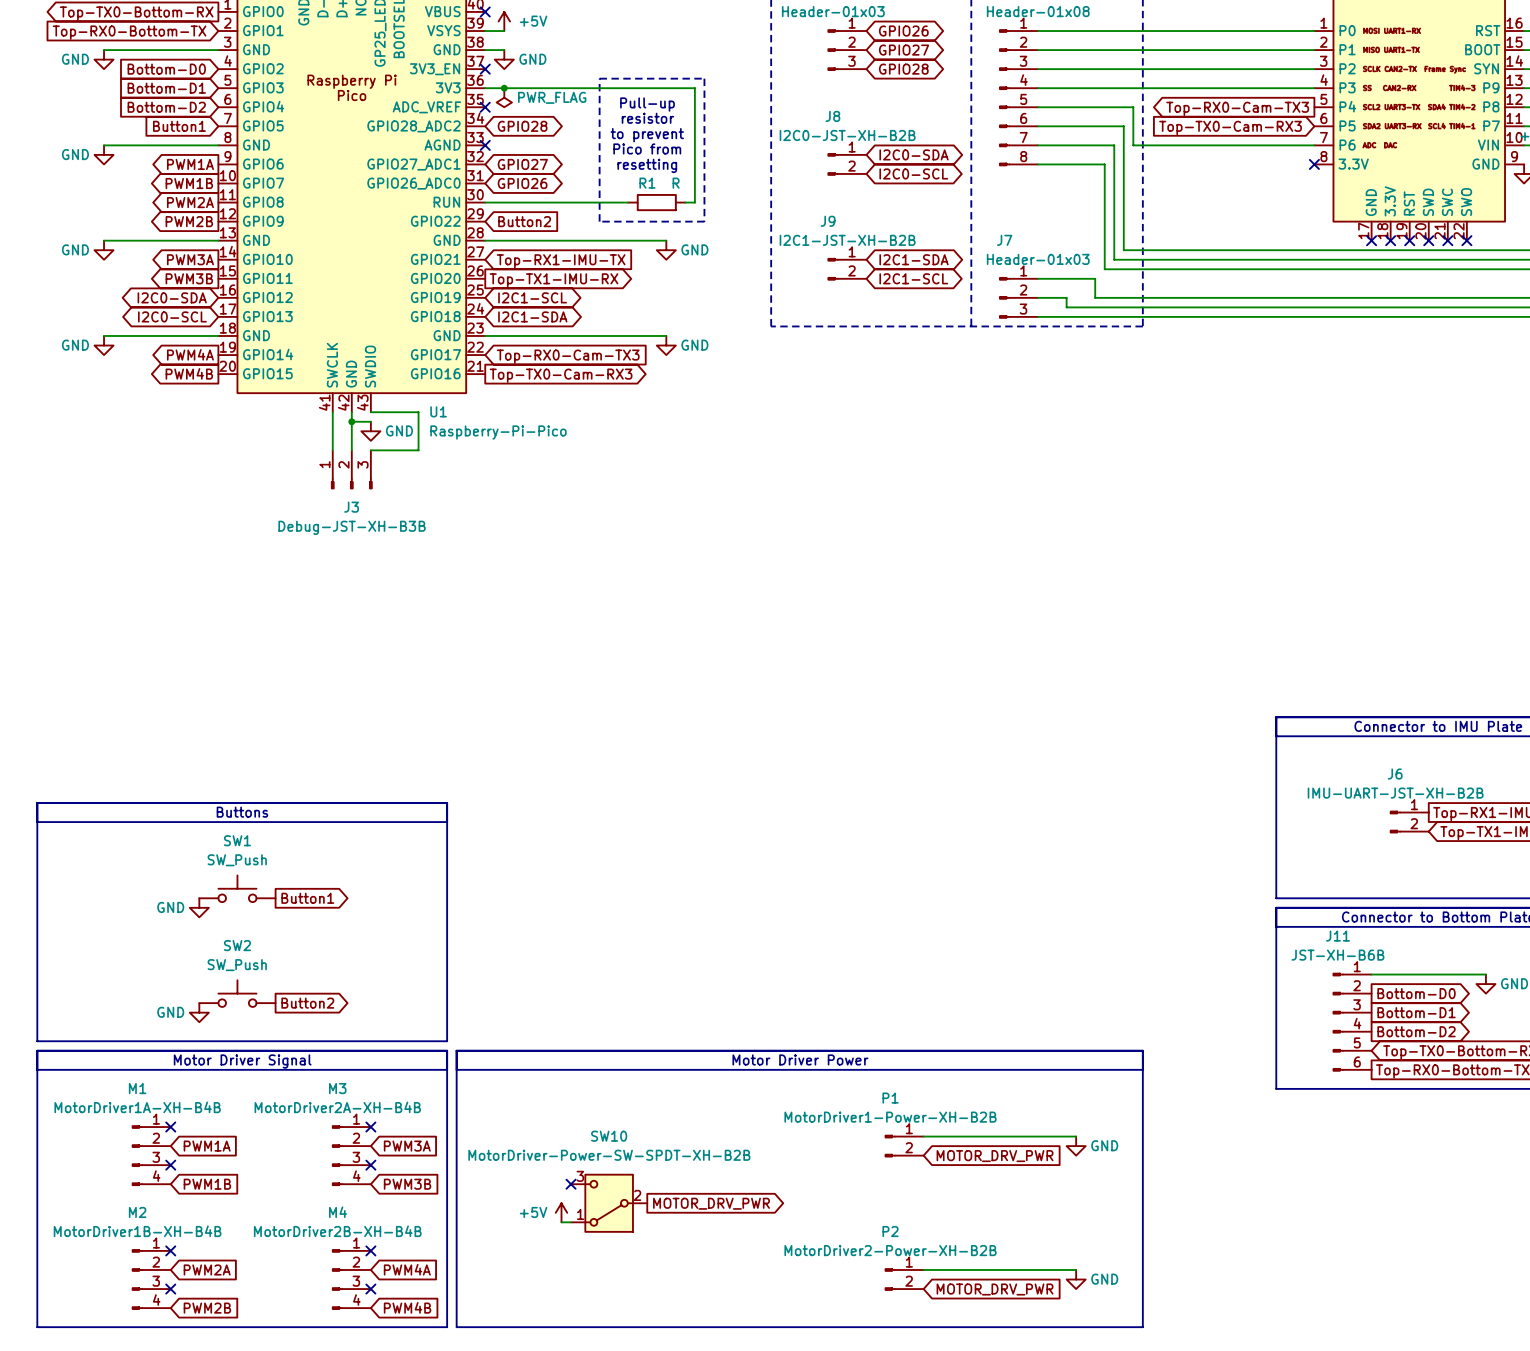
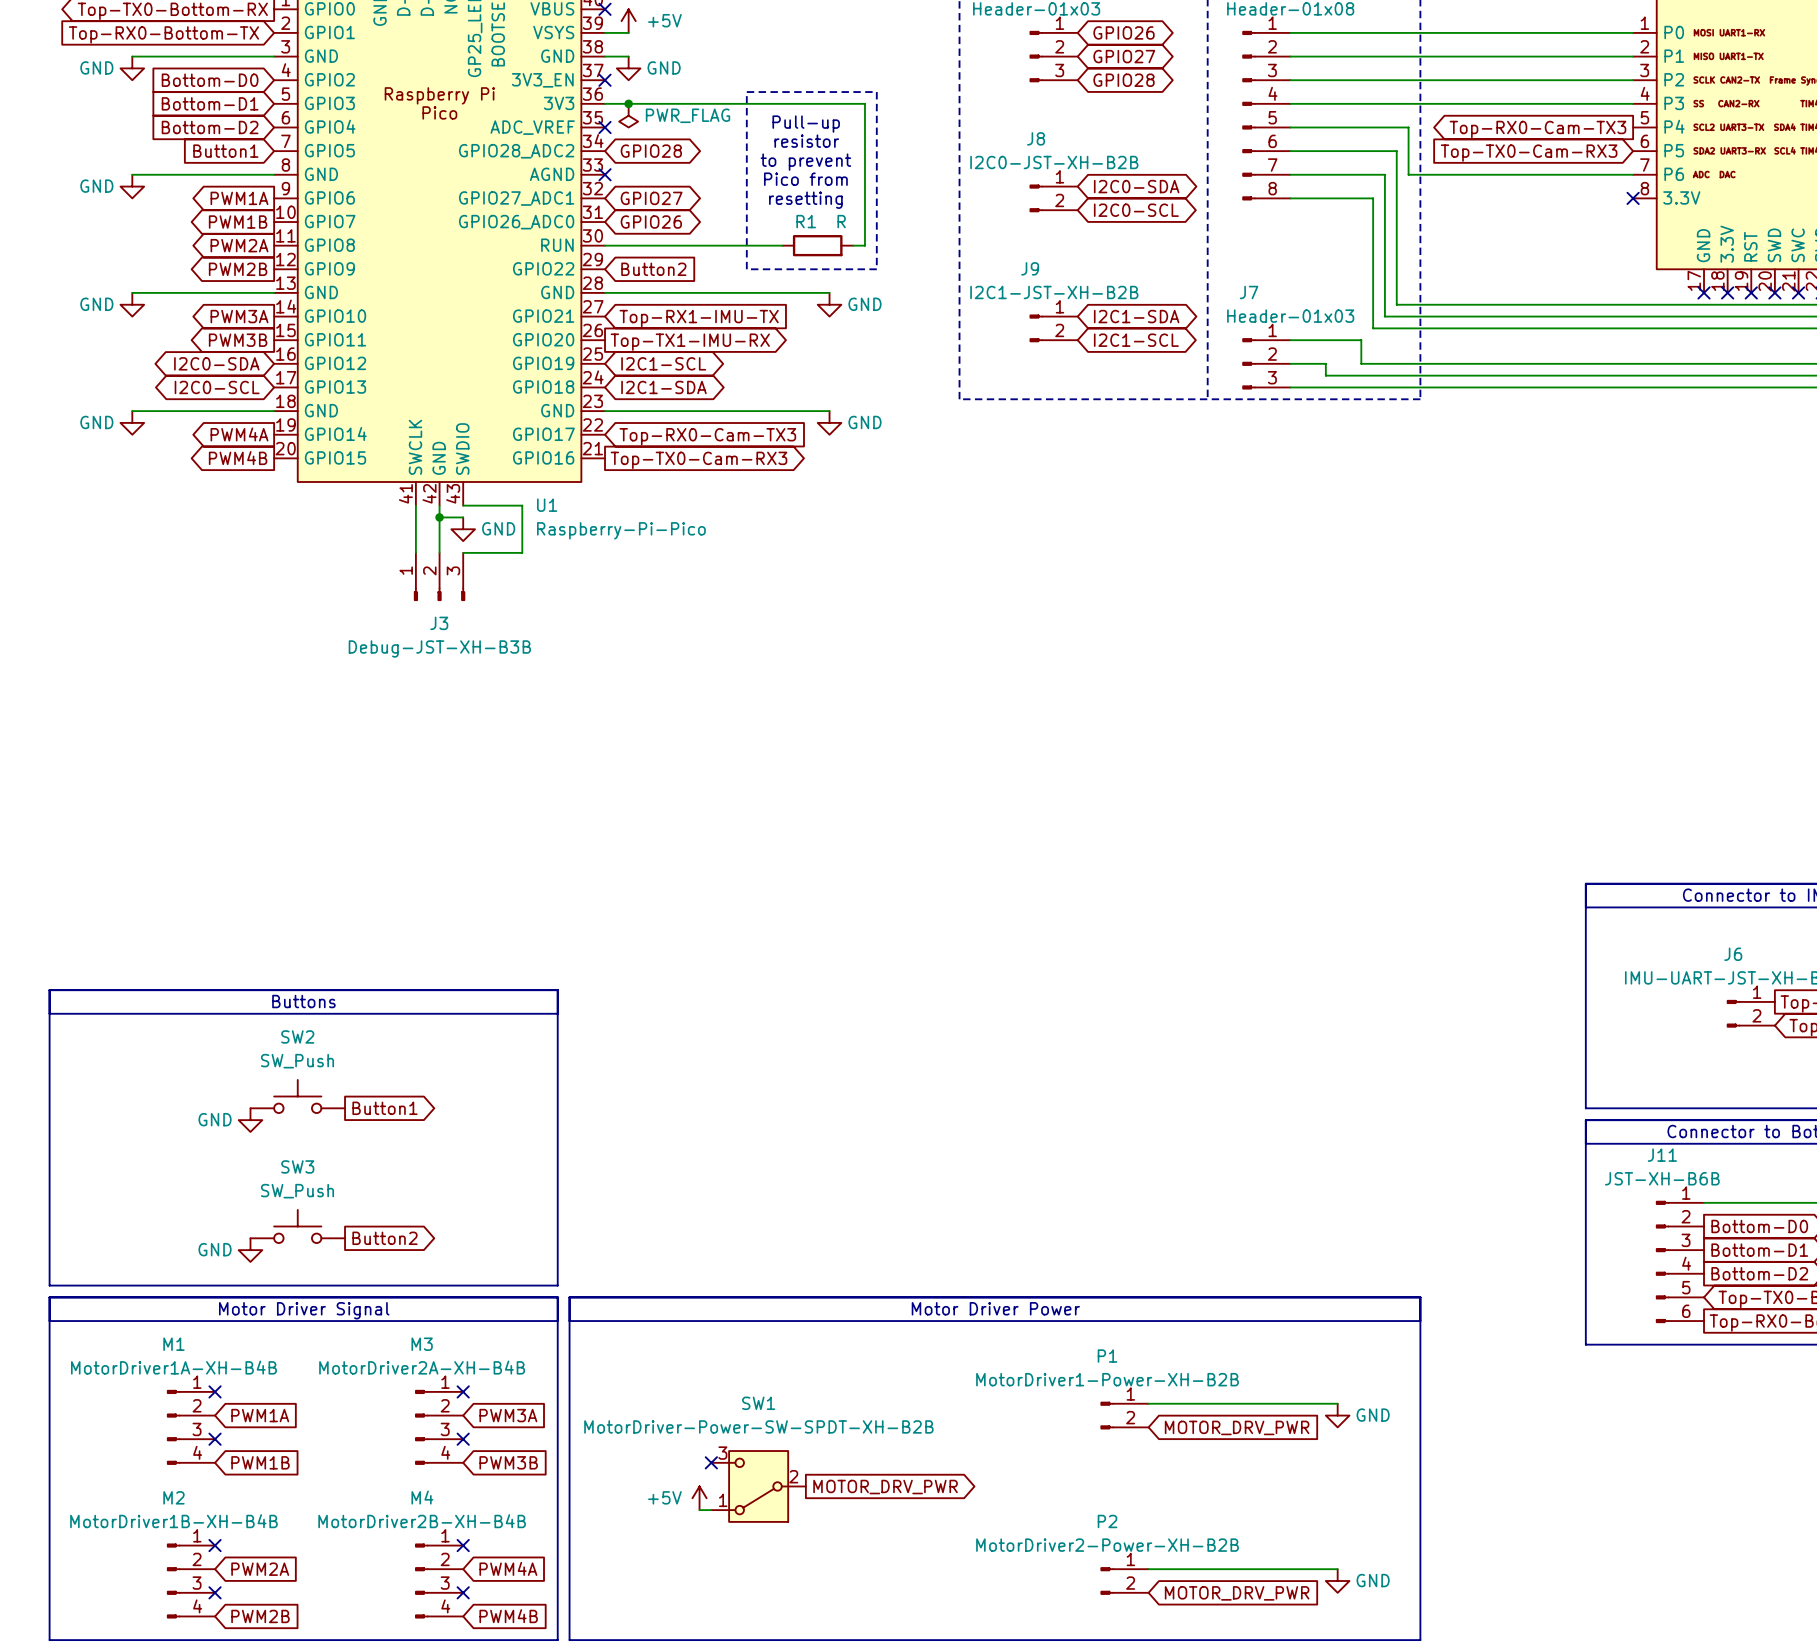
SW1 name: SW1 (237, 840) -> SW2 (297, 1036)
SW2 name: SW2 (237, 945) -> SW3 (297, 1166)
SW10 name: SW10 (609, 1136) -> SW1 (758, 1403)

